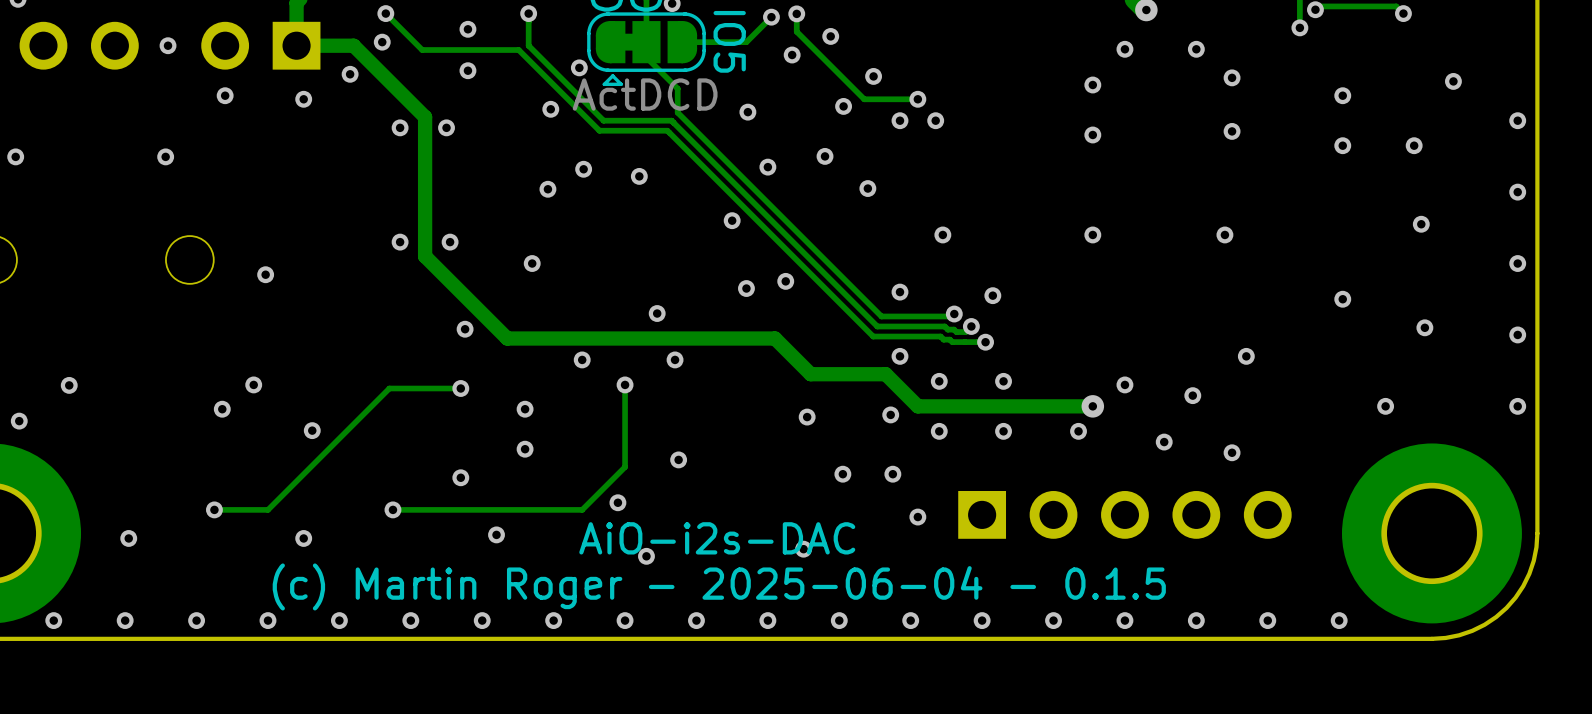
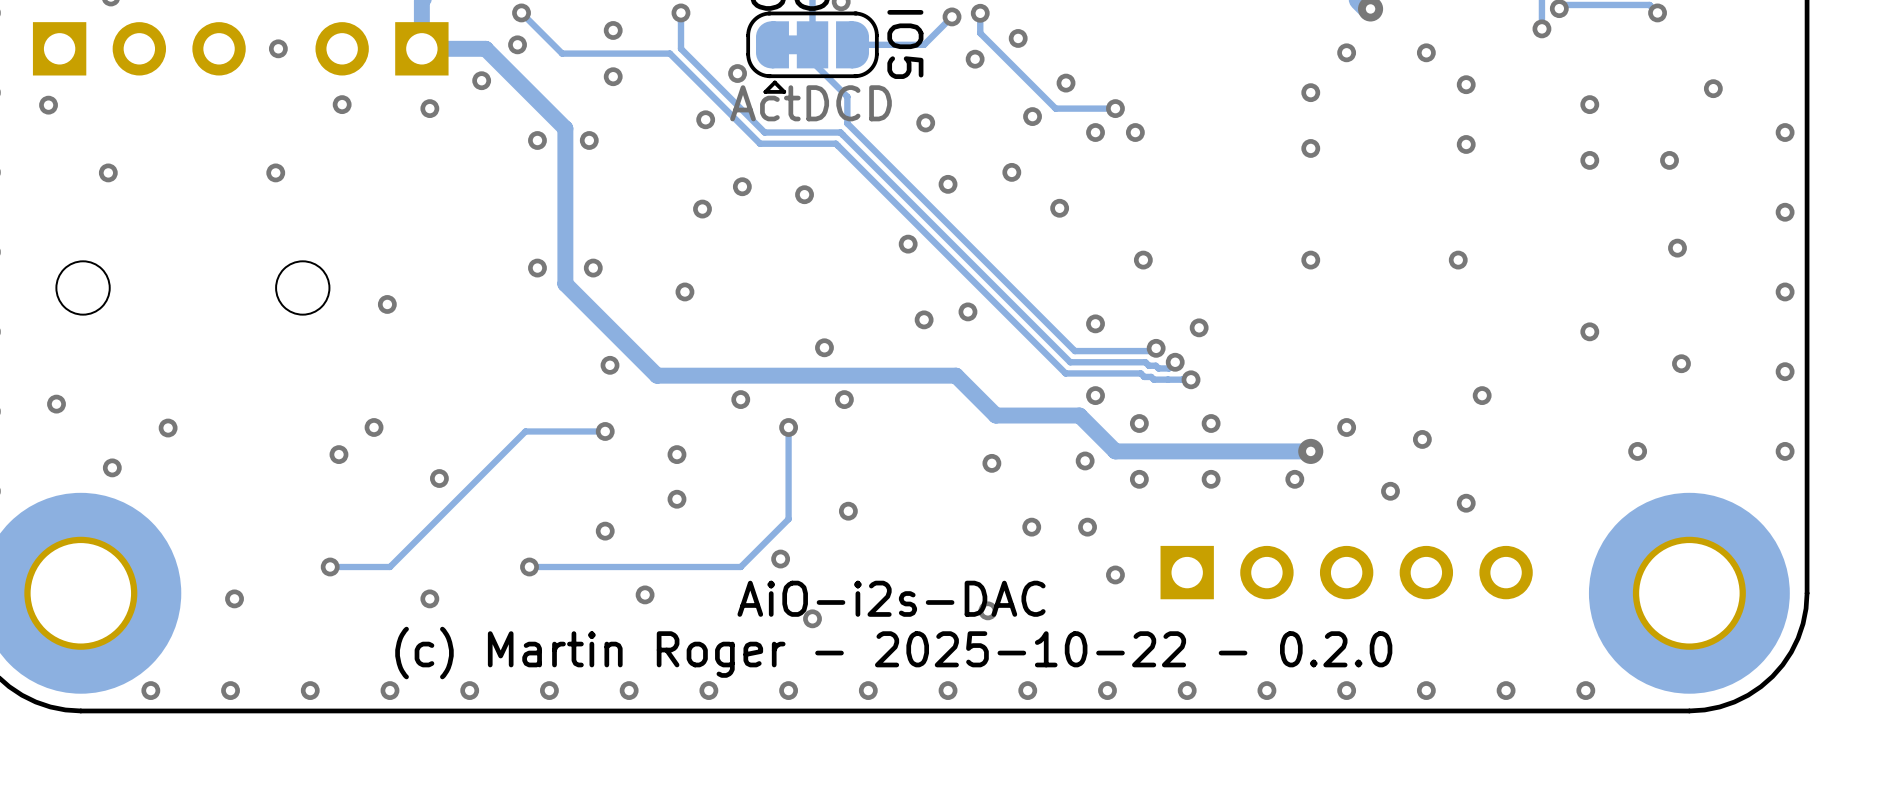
text: (c) Martin Roger - 2025-06-04 - 0.1.5 (719, 586) -> (c) Martin Roger - 2025-10-22 - 0.2.0 (893, 653)

